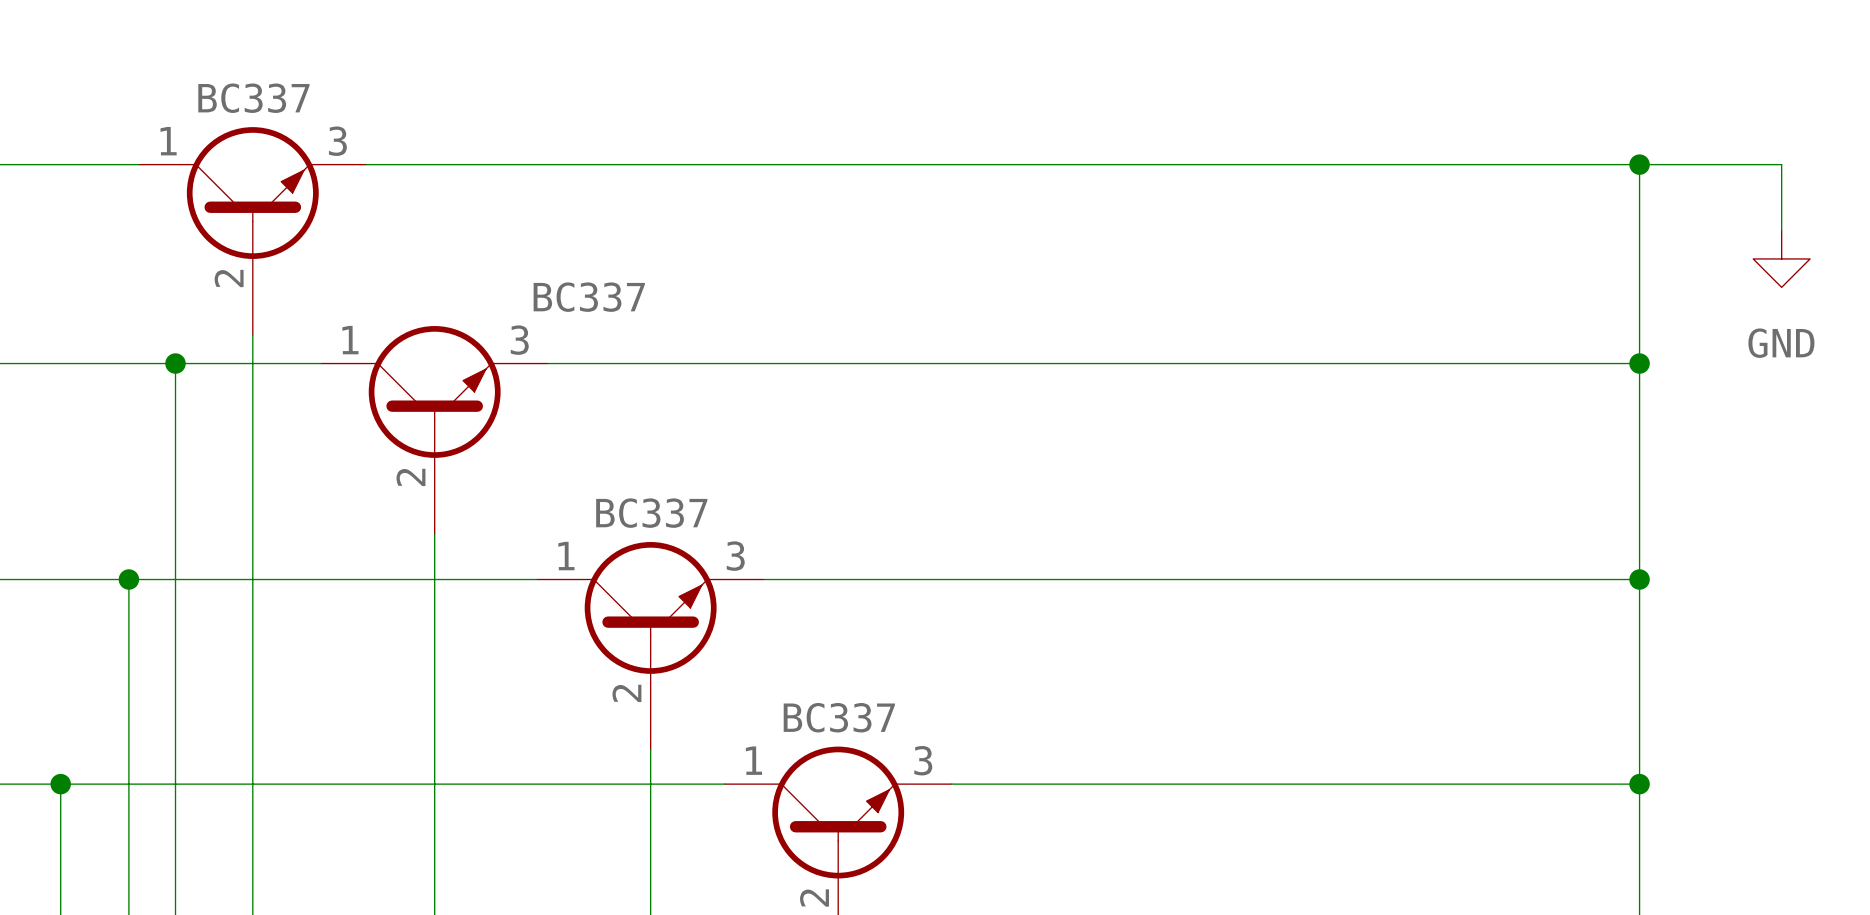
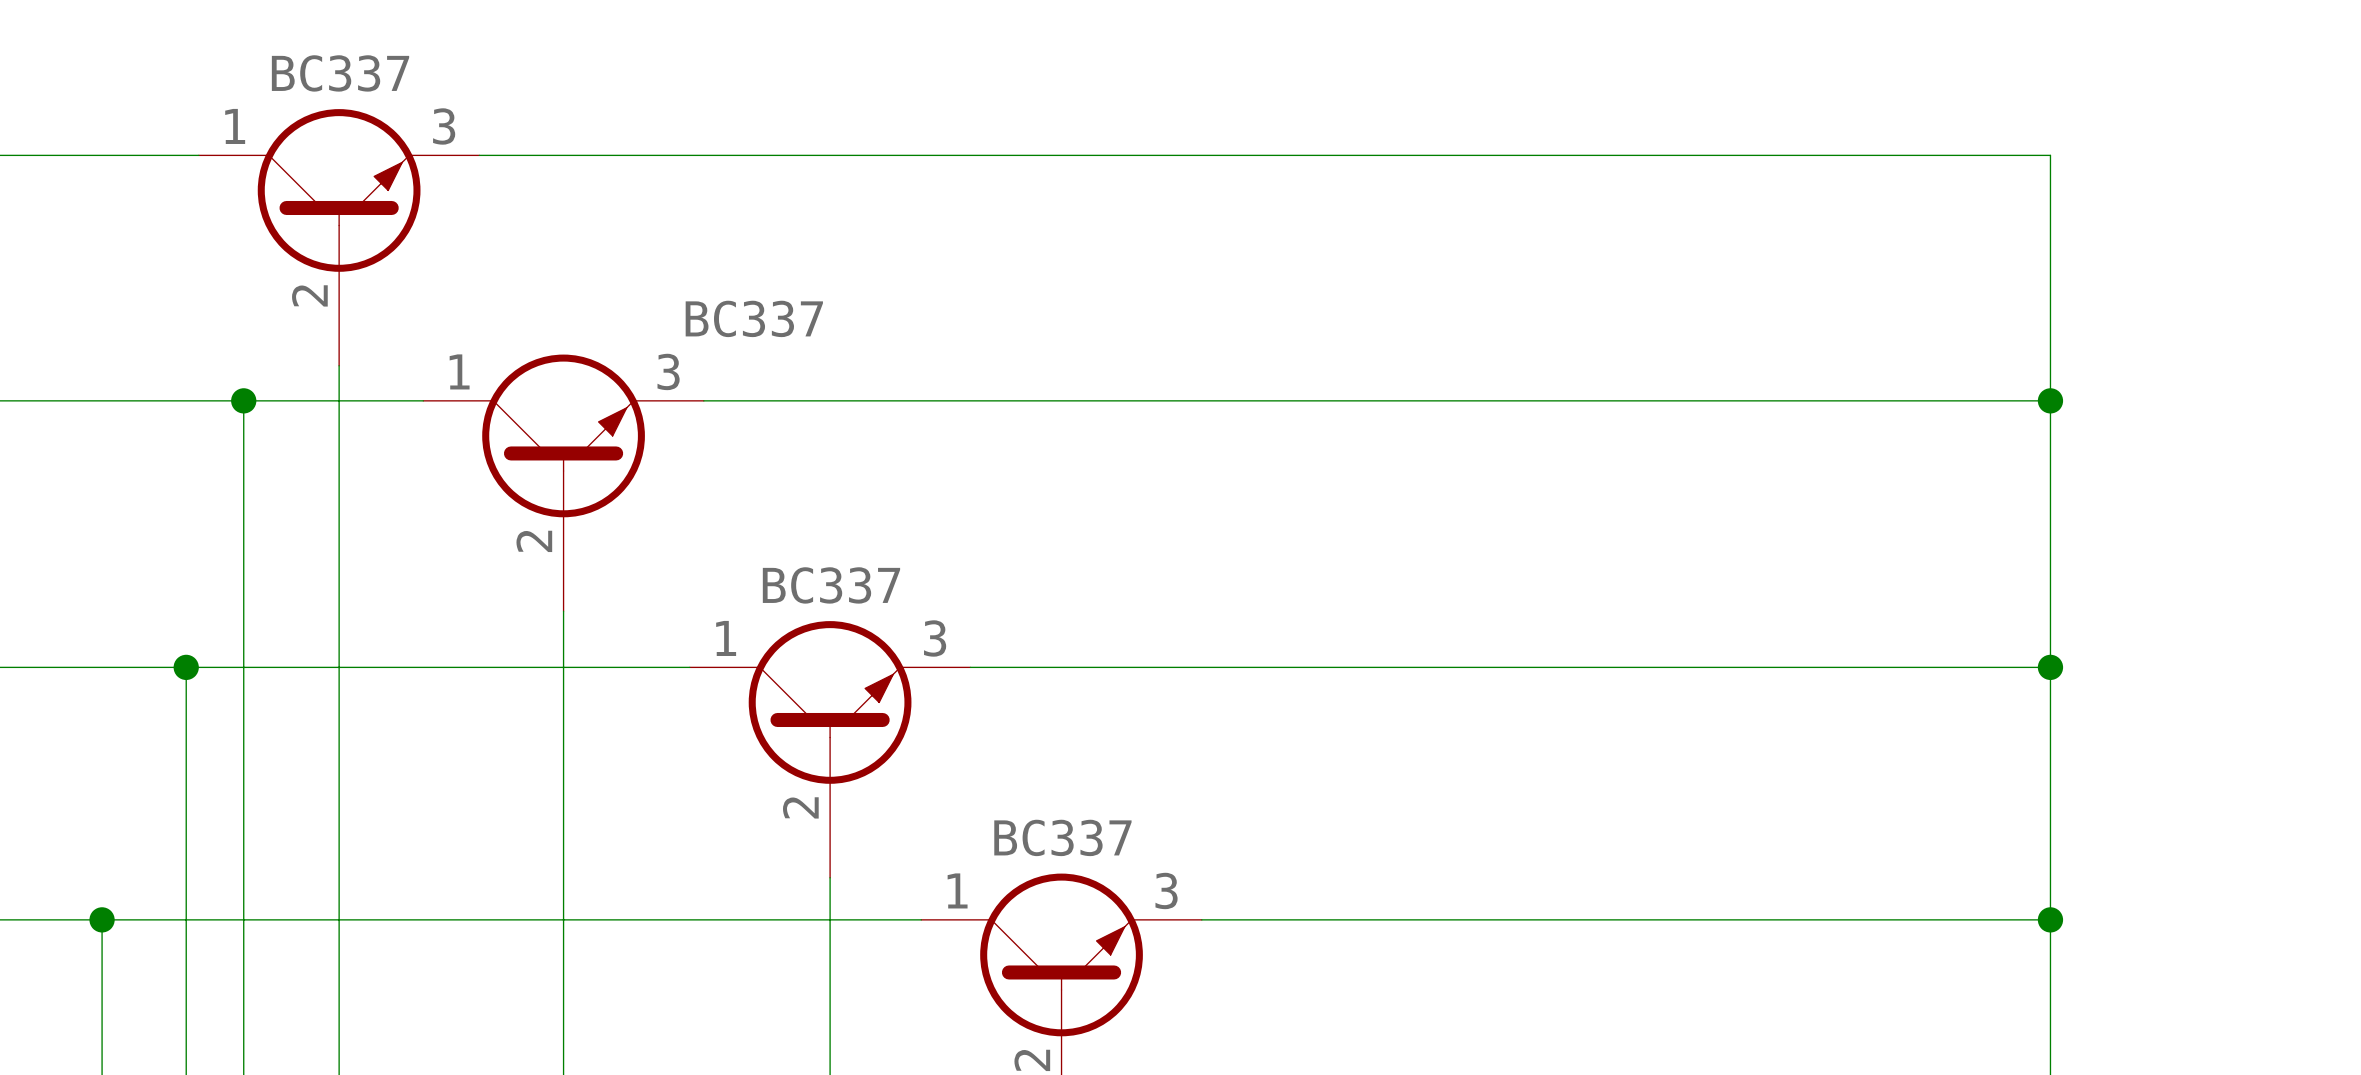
wire: (1639, 164) (1781, 164) (1781, 230) -> none
junction: (1639, 164) -> none
power symbol: GND (1781, 258) -> none

